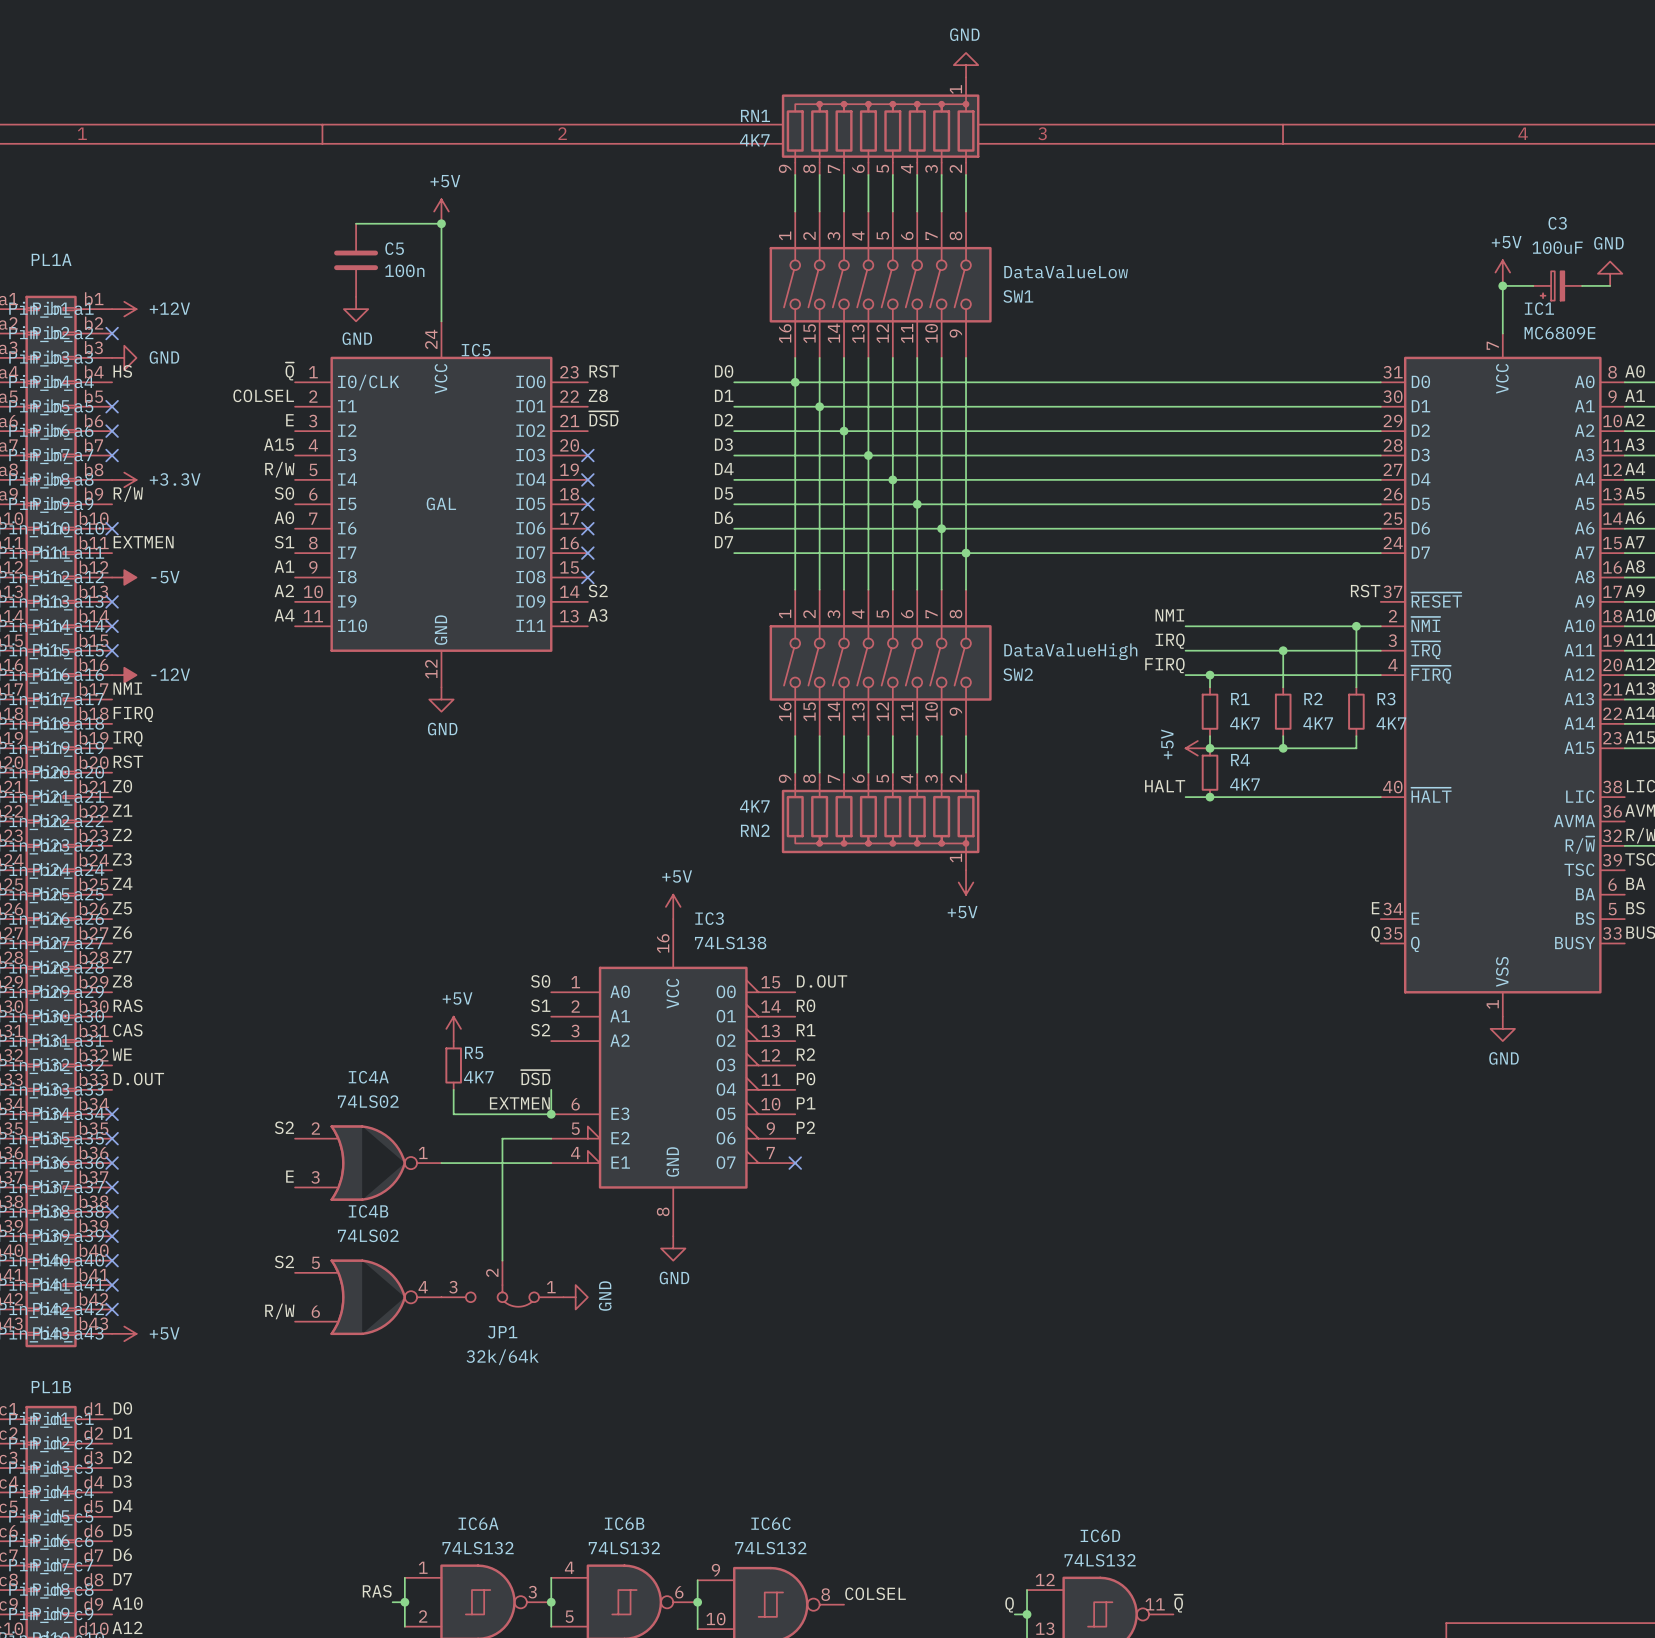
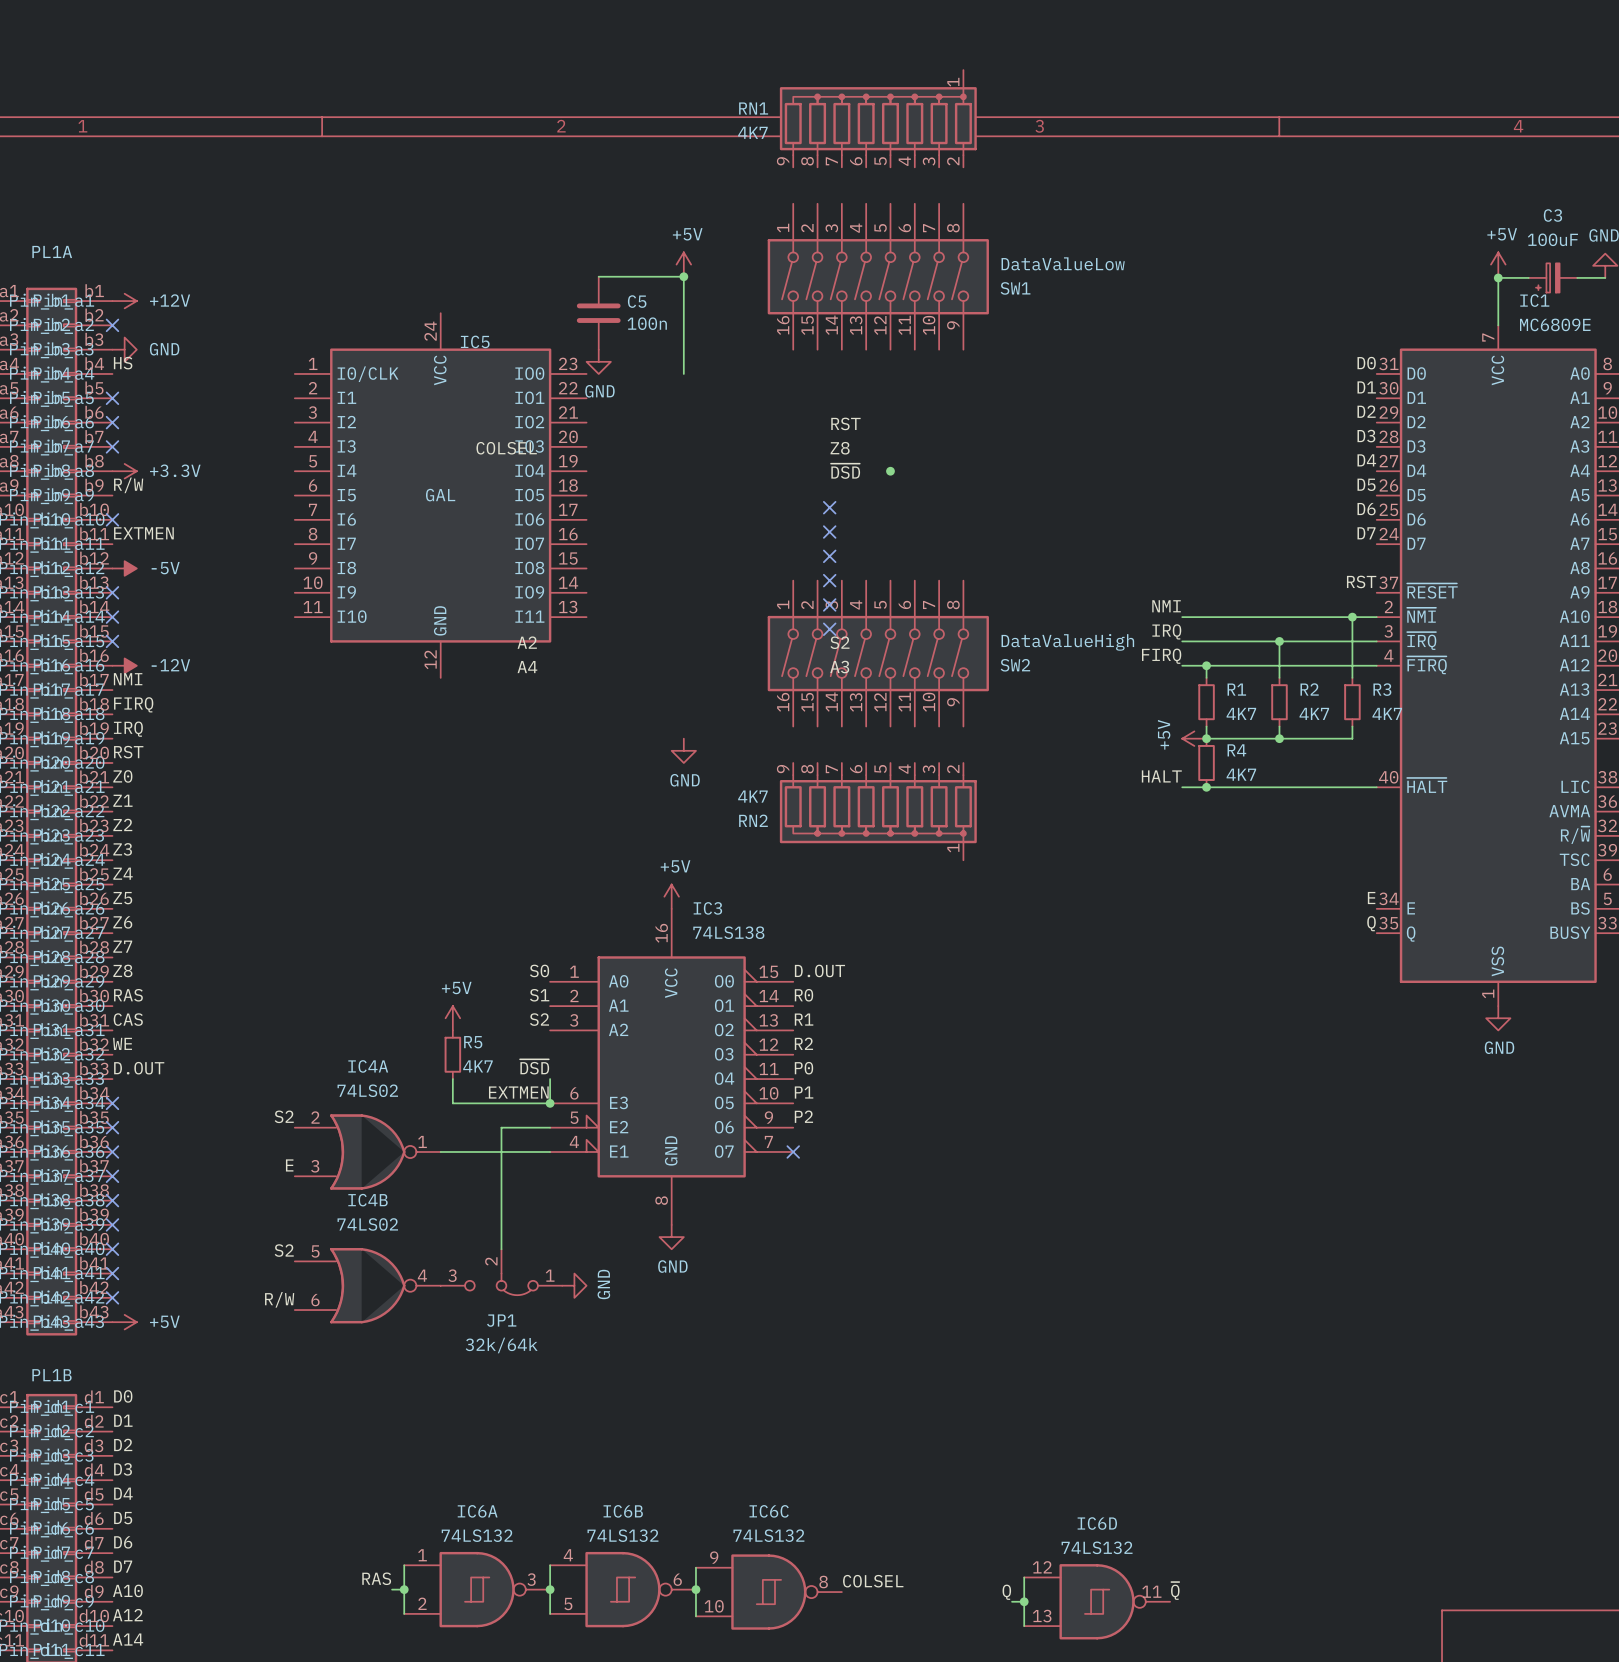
power symbol: GND (966, 65) -> none
wire: (795, 174) (795, 211) -> none
wire: (819, 174) (819, 211) -> none
wire: (844, 174) (844, 211) -> none
wire: (868, 174) (868, 211) -> none
wire: (892, 174) (892, 211) -> none
wire: (917, 174) (917, 211) -> none
wire: (941, 174) (941, 211) -> none
wire: (966, 174) (966, 211) -> none
power symbol: +5V (441, 211) -> none
wire: (356, 223) (441, 223) (441, 321) -> none
junction: (441, 223) -> none
C5 position: (356, 260) -> (598, 313)
power symbol: none -> +5V (683, 264)
wire: none -> (598, 276) (683, 276) (683, 373)
junction: none -> (683, 276)
power symbol: GND (356, 309) -> none
wire: (795, 357) (795, 589) -> none
wire: (819, 357) (819, 589) -> none
wire: (844, 357) (844, 589) -> none
wire: (868, 357) (868, 589) -> none
wire: (892, 357) (892, 589) -> none
wire: (917, 357) (917, 589) -> none
wire: (941, 357) (941, 589) -> none
wire: (966, 357) (966, 589) -> none
power symbol: none -> GND (598, 361)
label: ~{Q} (289, 371) -> none
label: RST (604, 371) -> none
label: D0 (724, 371) -> none
label: none -> D0 (1366, 363)
wire: (734, 382) (1380, 382) -> none
junction: (795, 382) -> none
label: COLSEL (263, 395) -> none
label: Z8 (598, 395) -> none
label: D1 (724, 395) -> none
label: none -> D1 (1366, 387)
wire: (734, 406) (1380, 406) -> none
junction: (819, 406) -> none
label: ~{DSD} (603, 418) -> none
label: E (289, 420) -> none
label: D2 (724, 420) -> none
label: none -> D2 (1366, 411)
wire: (734, 431) (1380, 431) -> none
junction: (844, 431) -> none
label: none -> RST (845, 423)
label: A15 (279, 444) -> none
label: D3 (723, 444) -> none
label: none -> D3 (1366, 436)
no-connect mark: (587, 455) -> none
wire: (734, 455) (1380, 455) -> none
junction: (868, 455) -> none
label: none -> COLSEL (506, 448)
label: none -> Z8 (840, 448)
label: R/W (279, 469) -> none
label: D4 (724, 469) -> none
label: none -> D4 (1366, 460)
no-connect mark: (587, 479) -> none
wire: (734, 479) (1380, 479) -> none
label: none -> ~{DSD} (845, 471)
label: S0 (284, 493) -> none
label: D5 (724, 493) -> none
label: none -> D5 (1366, 484)
no-connect mark: (587, 504) -> none
wire: (734, 504) (1380, 504) -> none
junction: (917, 504) -> none
no-connect mark: none -> (829, 507)
label: A0 (284, 517) -> none
label: D6 (724, 517) -> none
label: none -> D6 (1366, 509)
no-connect mark: (587, 528) -> none
wire: (734, 528) (1380, 528) -> none
junction: (941, 528) -> none
no-connect mark: none -> (829, 532)
label: S1 (284, 542) -> none
label: D7 (723, 542) -> none
label: none -> D7 (1366, 533)
no-connect mark: (587, 553) -> none
wire: (734, 553) (1380, 553) -> none
junction: (966, 553) -> none
no-connect mark: none -> (829, 556)
label: A1 (284, 566) -> none
no-connect mark: (587, 577) -> none
no-connect mark: none -> (829, 580)
label: A2 (284, 590) -> none
label: S2 (598, 591) -> none
no-connect mark: none -> (829, 604)
label: A4 (284, 615) -> none
label: A3 (597, 615) -> none
no-connect mark: none -> (829, 629)
label: none -> A2 (527, 642)
label: none -> S2 (839, 642)
label: none -> A4 (527, 667)
label: none -> A3 (839, 667)
power symbol: GND (441, 699) -> none
wire: (795, 736) (795, 772) -> none
wire: (819, 736) (819, 772) -> none
wire: (844, 736) (844, 772) -> none
wire: (868, 736) (868, 772) -> none
wire: (892, 736) (892, 772) -> none
wire: (917, 736) (917, 772) -> none
wire: (941, 736) (941, 772) -> none
wire: (966, 736) (966, 772) -> none
power symbol: none -> GND (683, 750)
power symbol: +5V (966, 882) -> none

